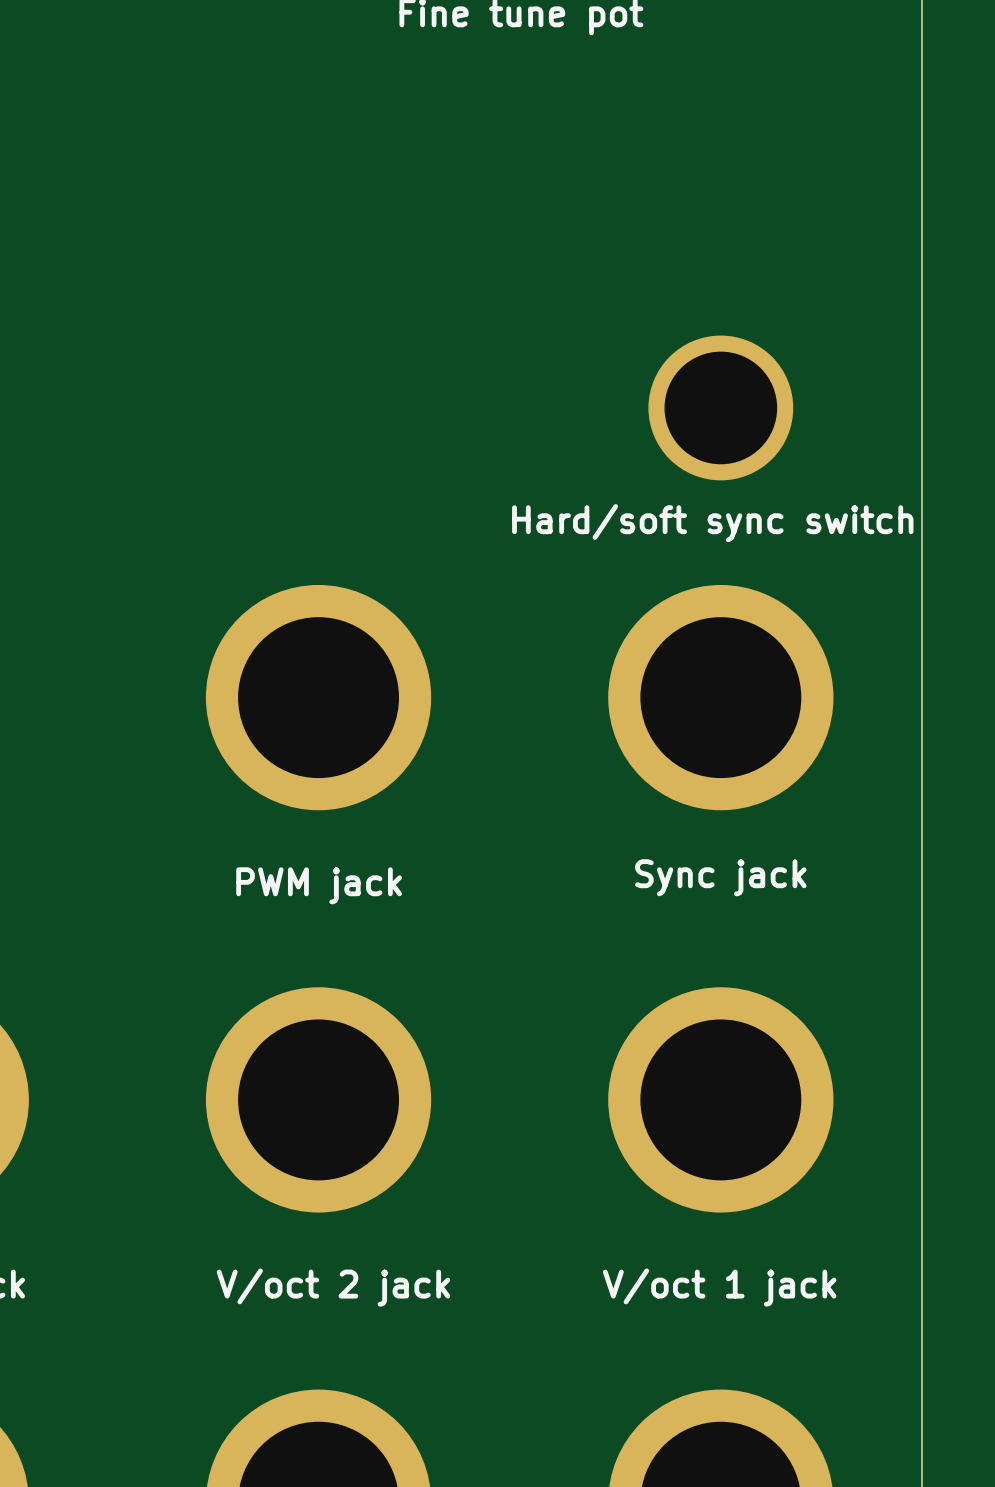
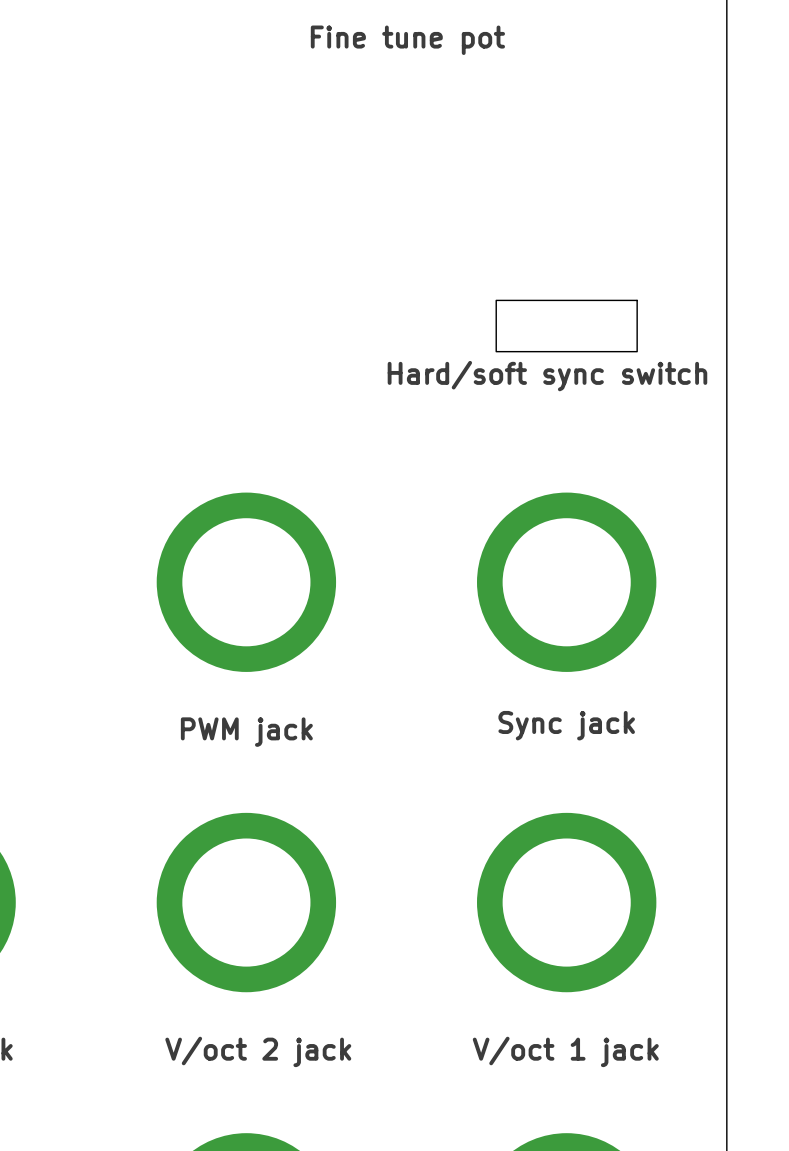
drawing: none -> [495, 300, 638, 352]
part: (720, 407) -> none
text position: Hard/soft sync switch (712, 523) -> Hard/soft sync switch (547, 376)

